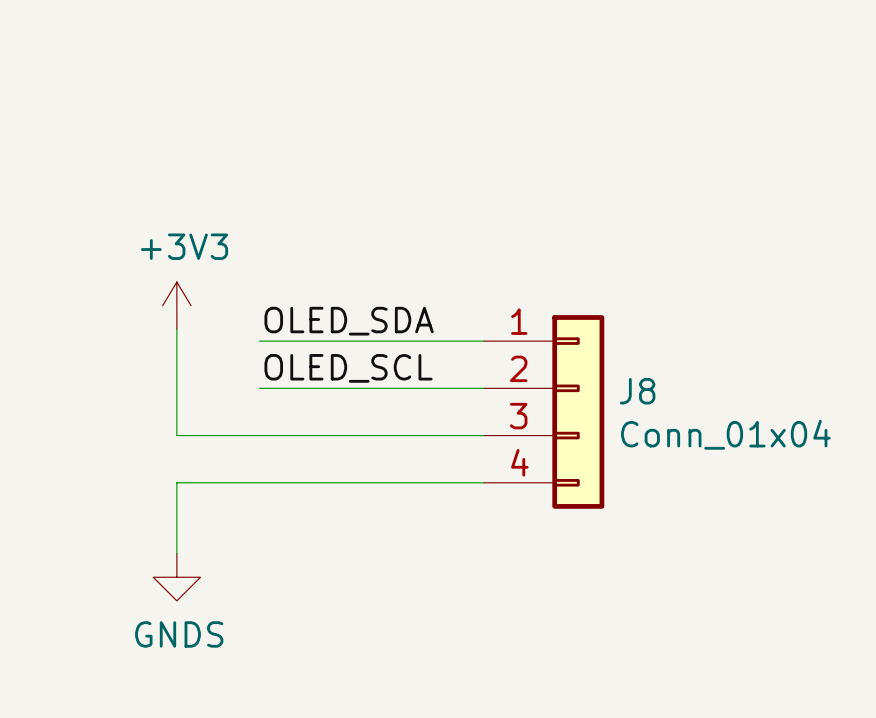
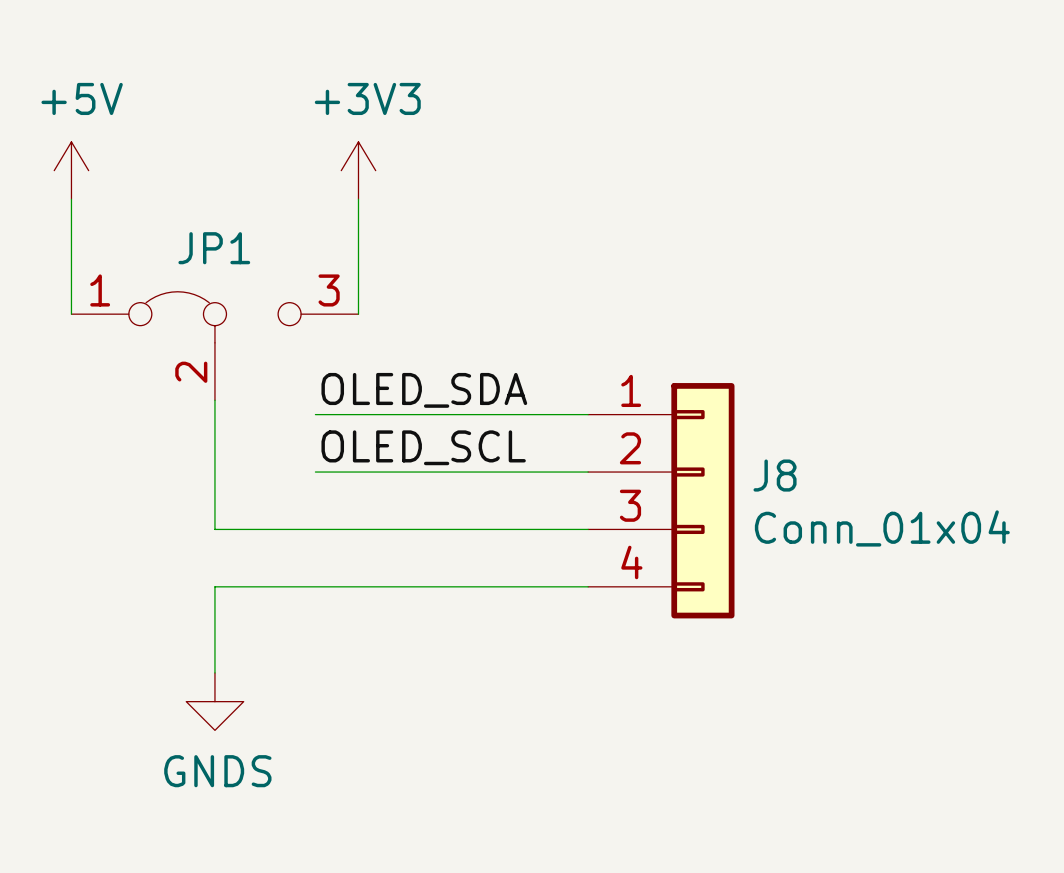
power symbol: none -> +5V (71, 170)
wire: none -> (71, 199) (71, 314)
wire: none -> (358, 199) (358, 314)
JP1: none -> (214, 346)
power symbol position: +3V3 (176, 305) -> +3V3 (358, 170)

